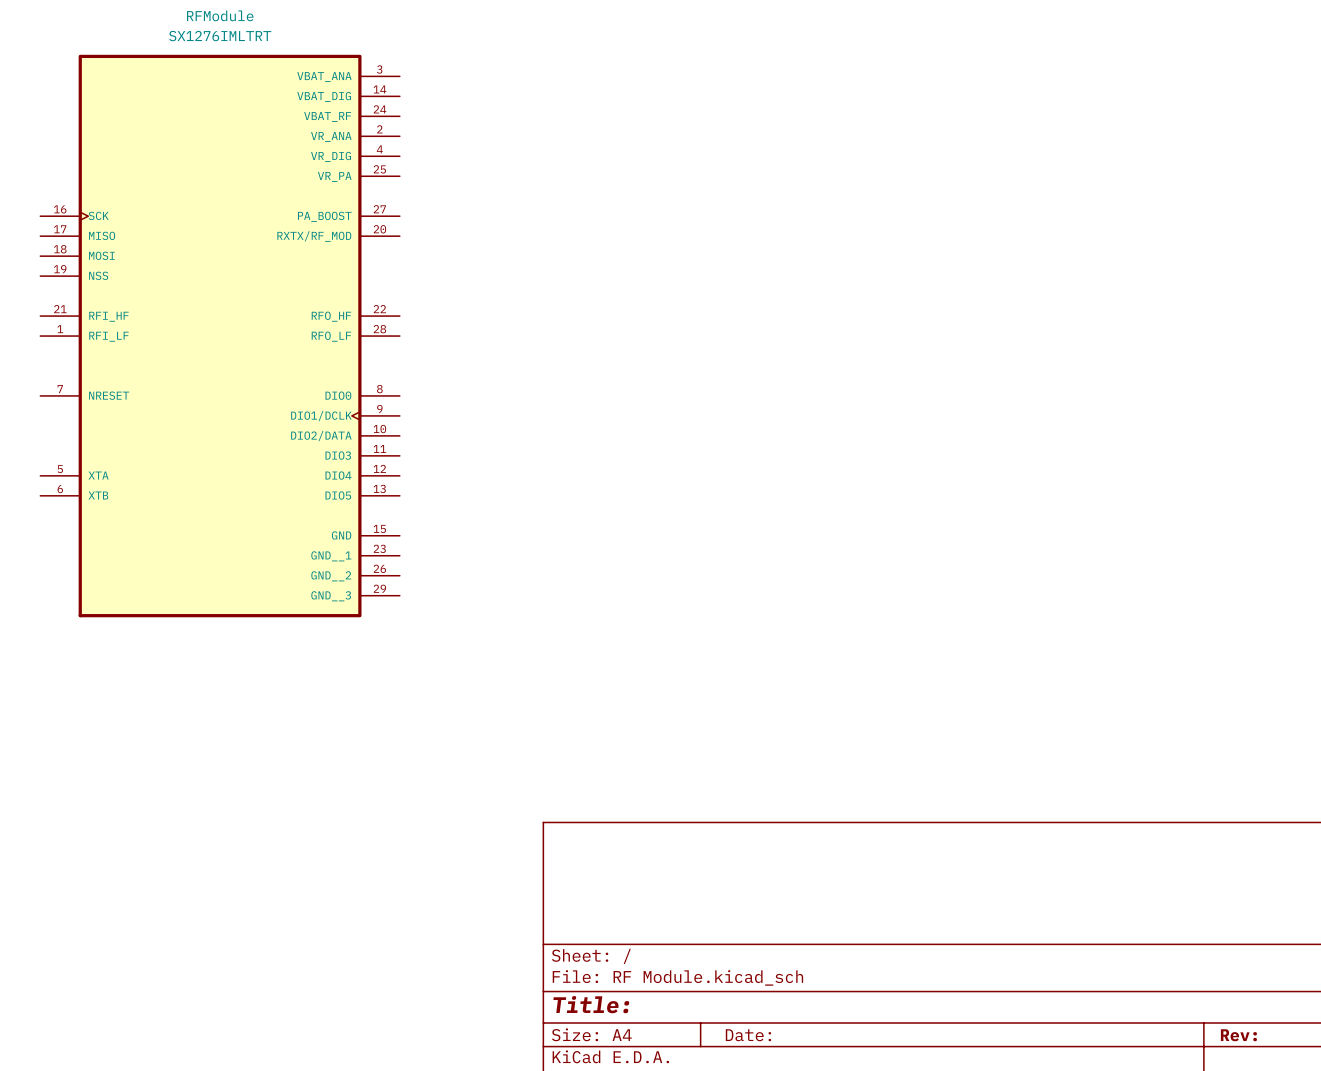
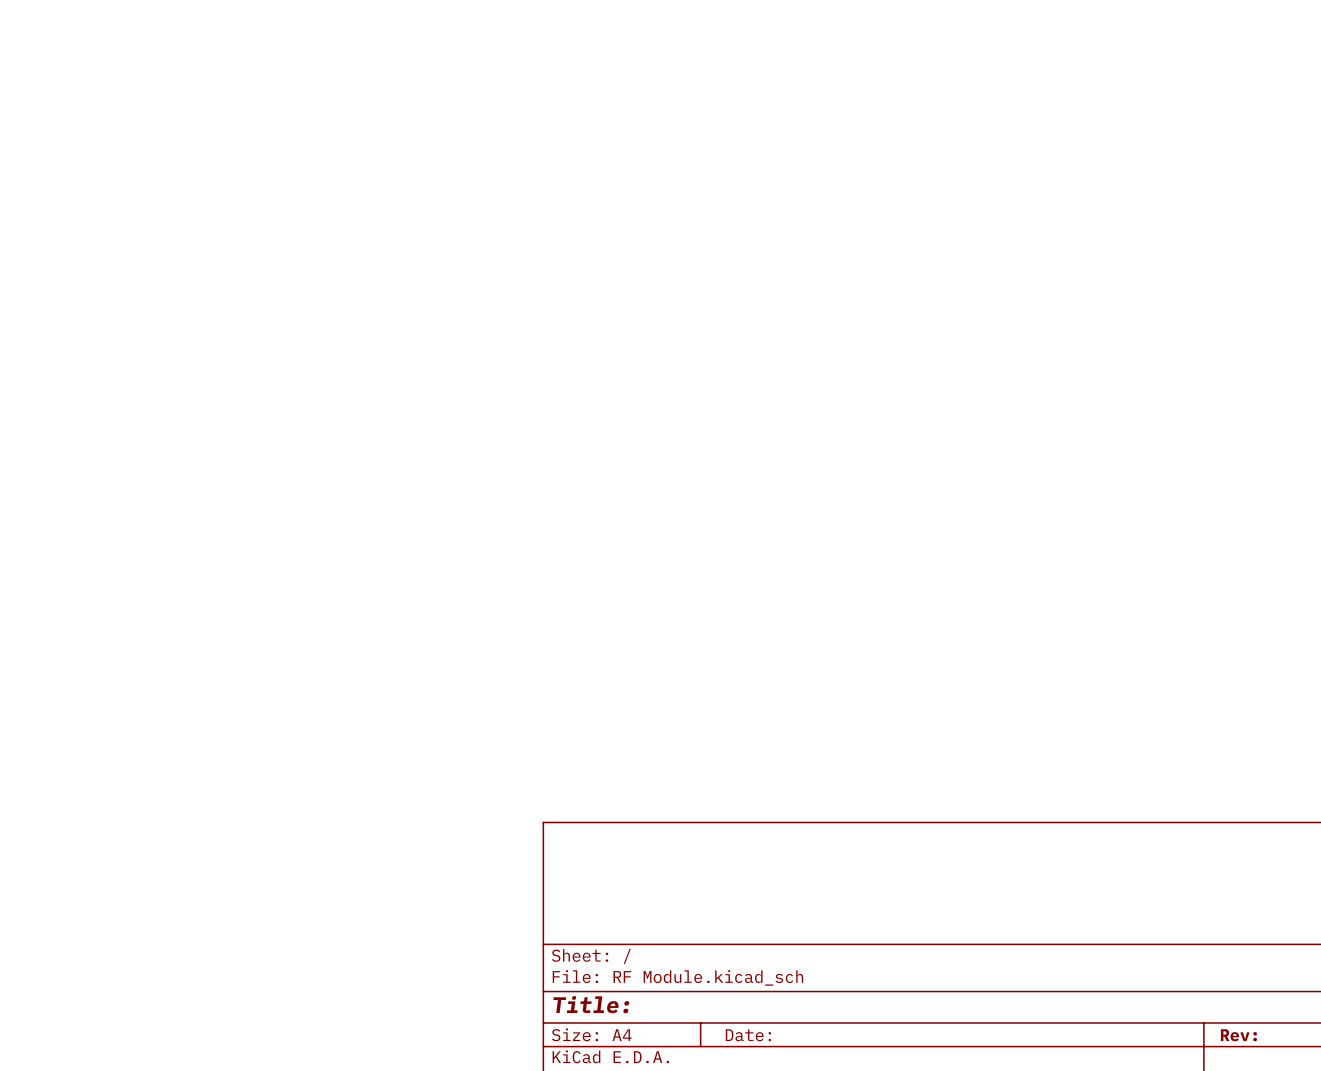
RFModule: SX1276IMLTRT (220, 336) -> none

